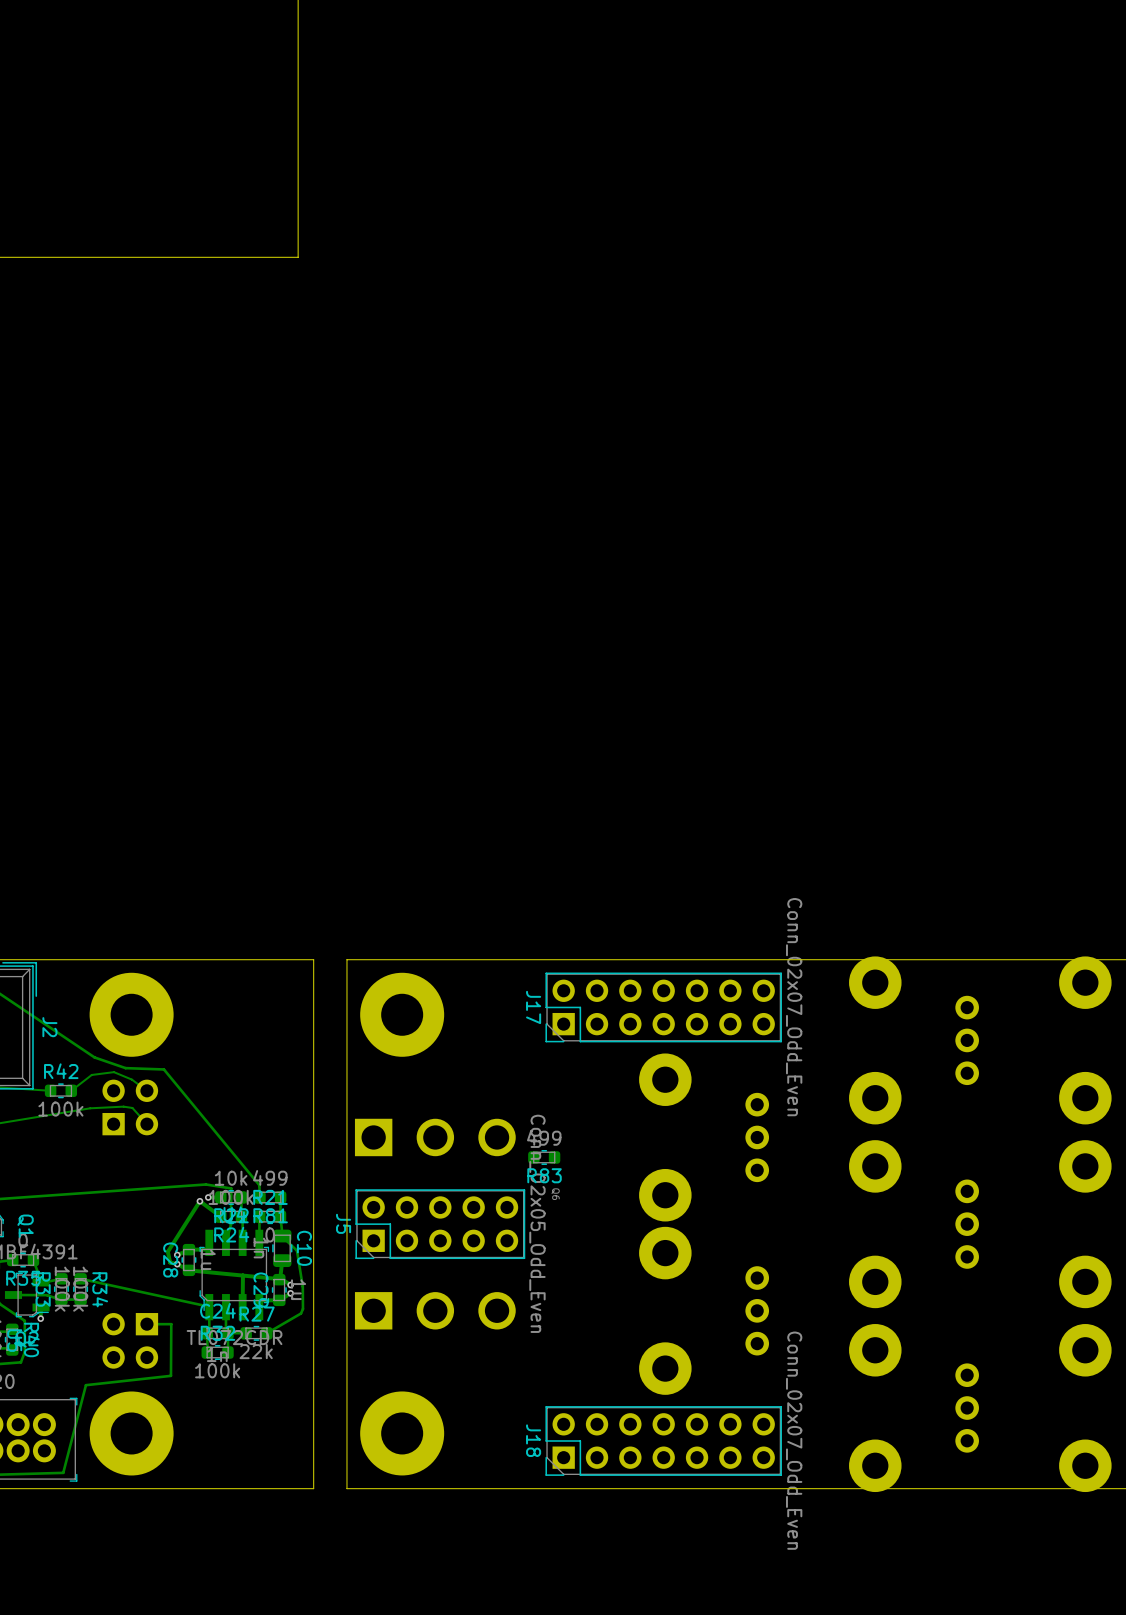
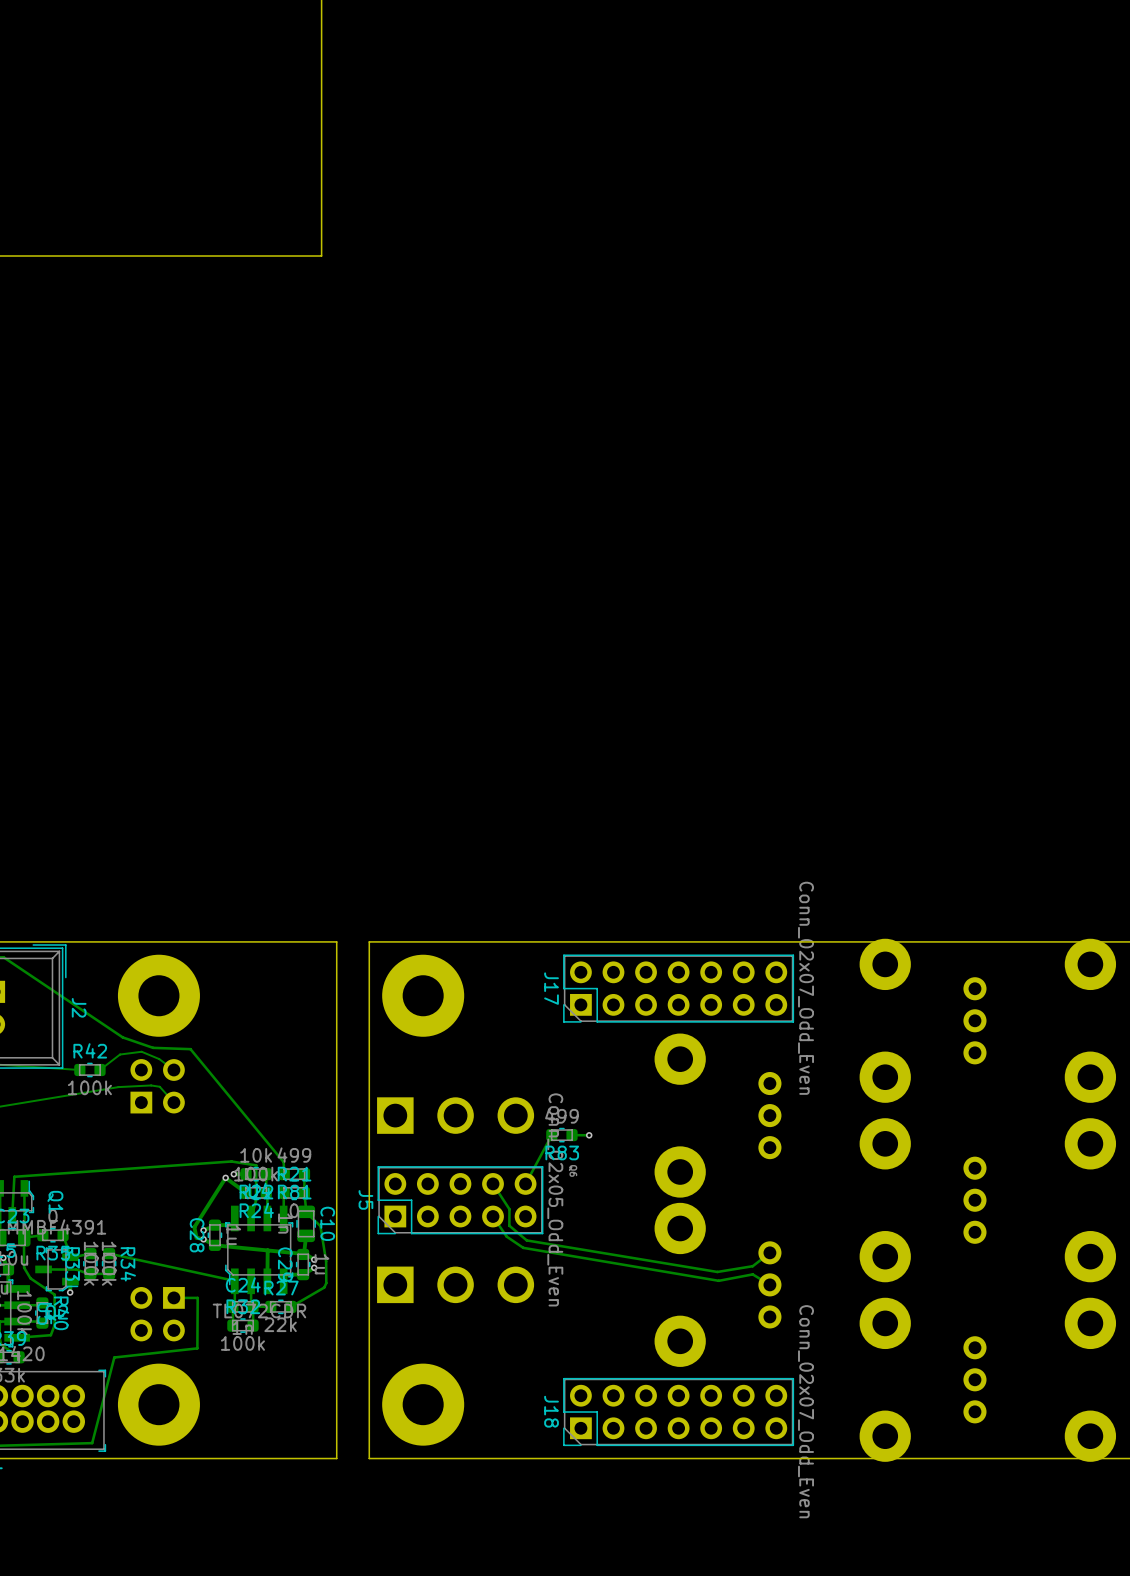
track: none -> (551, 1135) (525, 1183)
track: none -> (572, 1135) (589, 1135)
via: none -> (589, 1135)
track: none -> (493, 1183) (509, 1209) (509, 1225) (526, 1240) (717, 1271) (752, 1266) (769, 1252)
track: none -> (493, 1216) (506, 1236) (523, 1247) (718, 1280) (752, 1274) (769, 1284)

